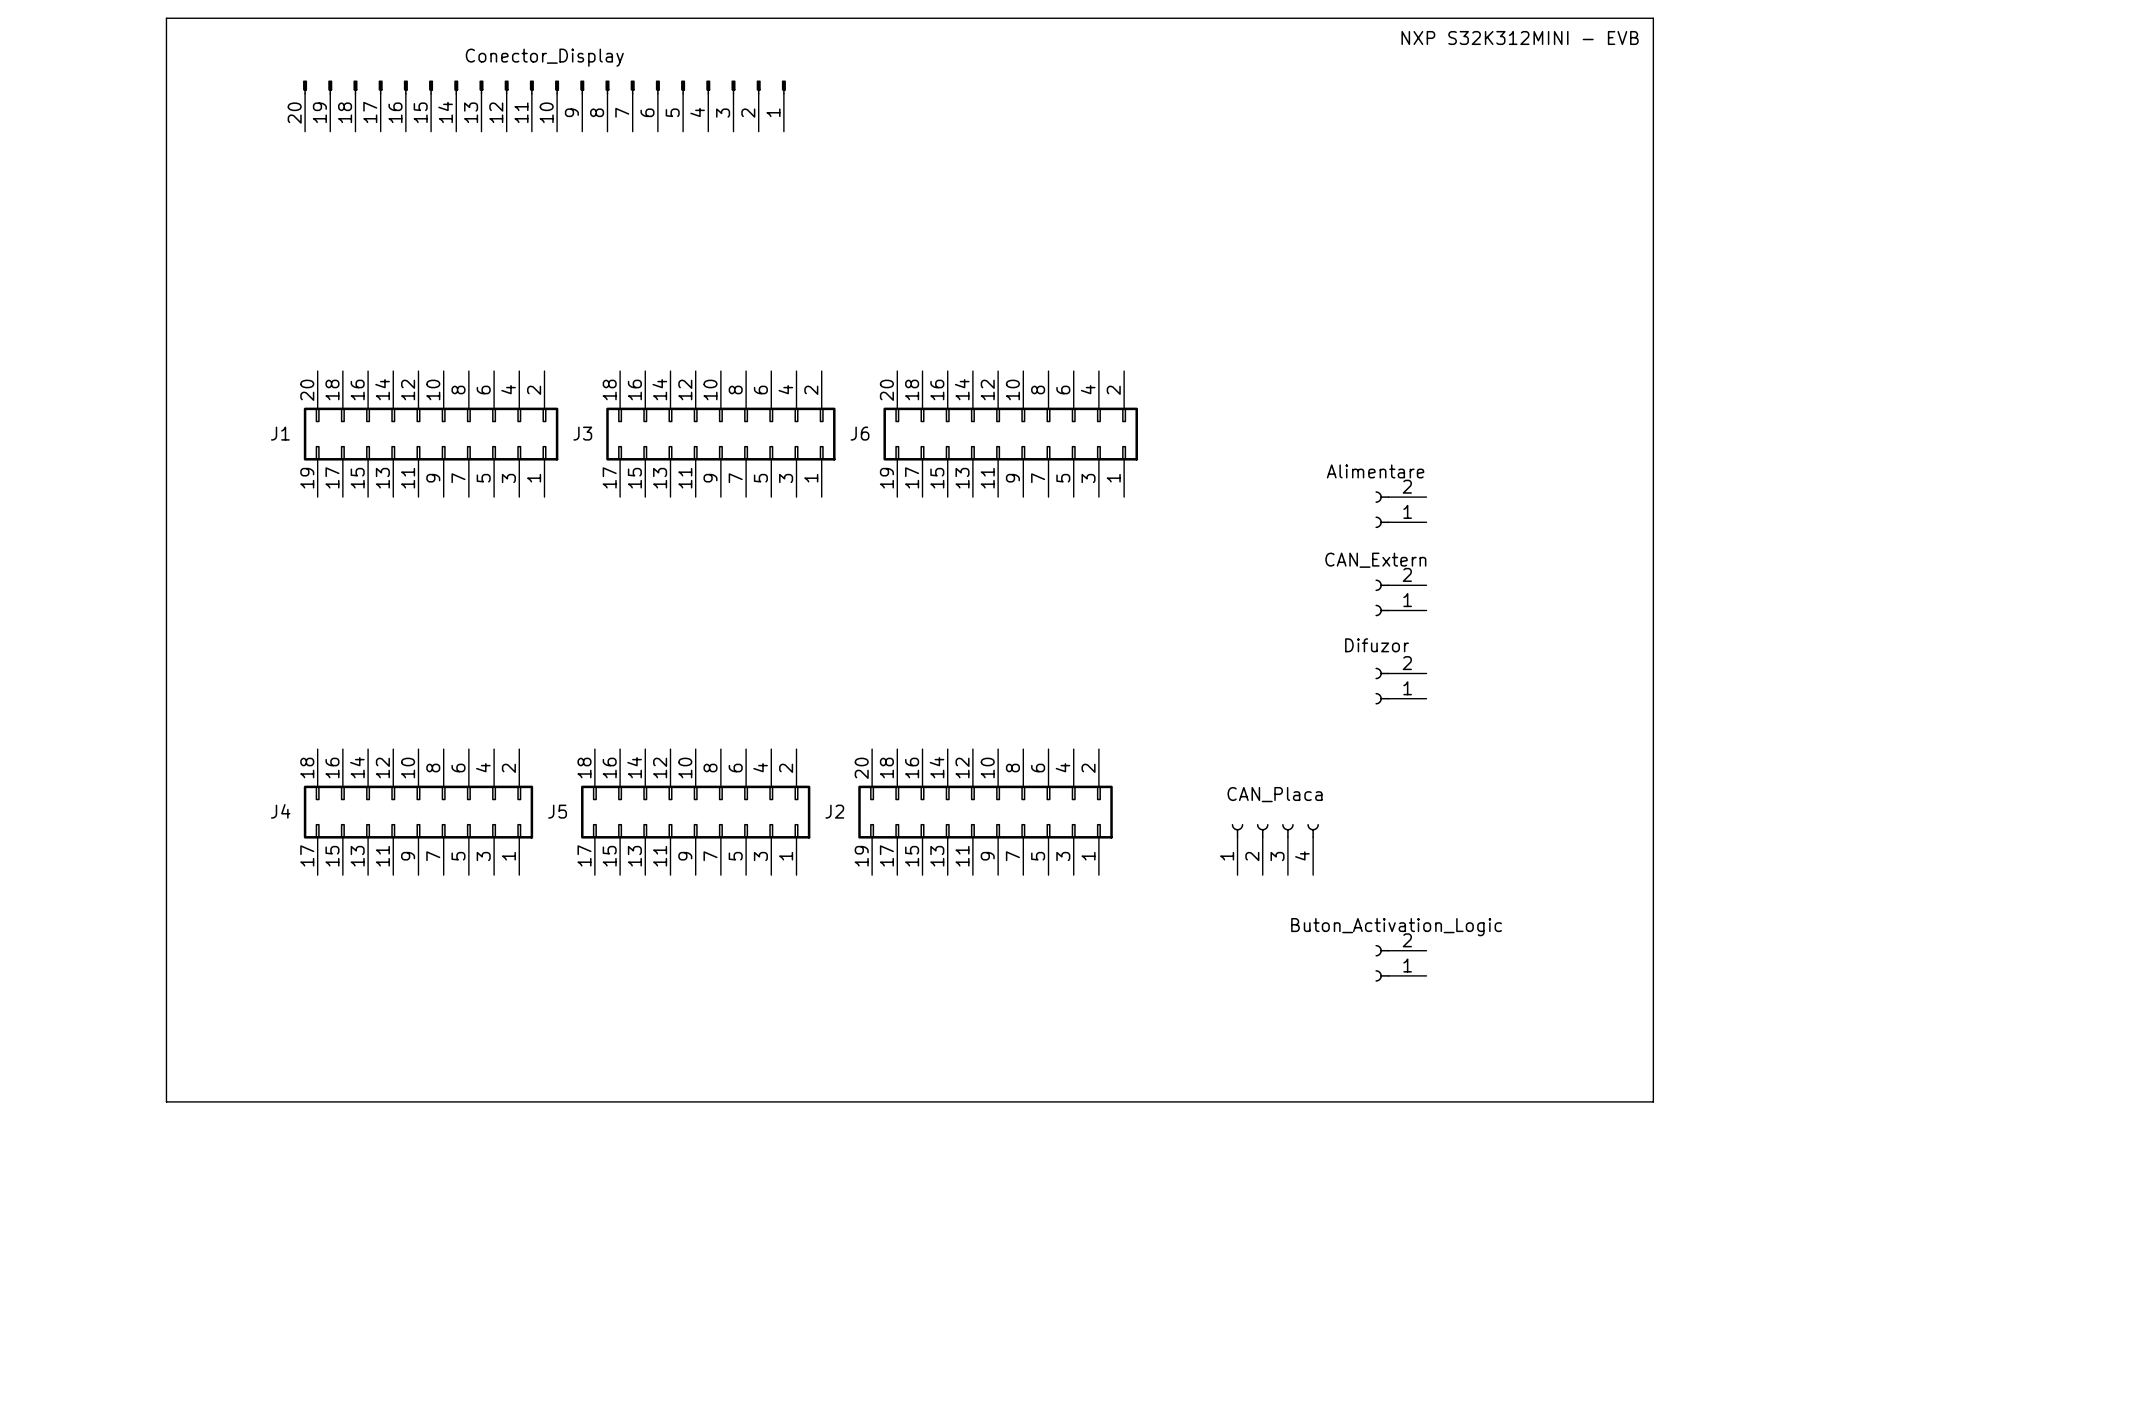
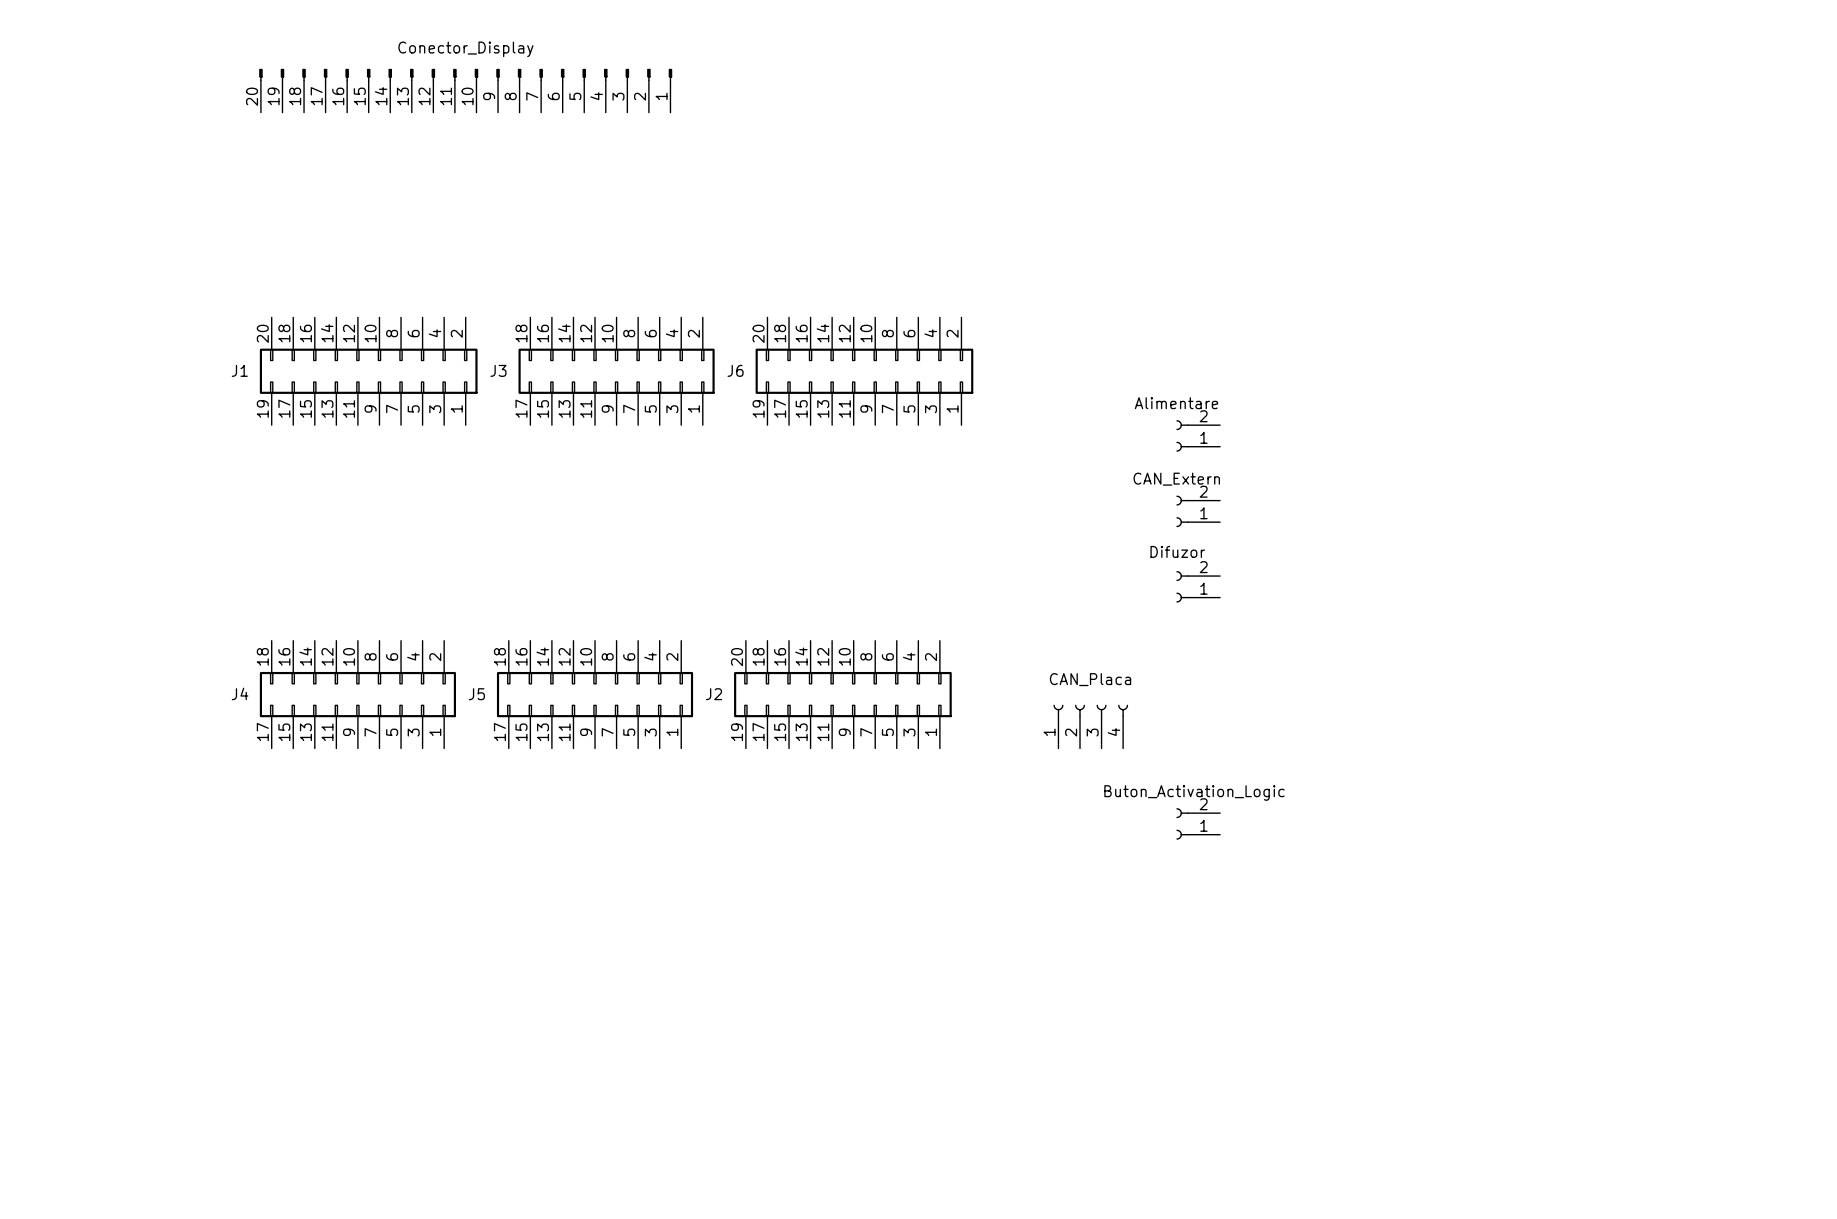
line: (166, 18) (1653, 18) (1653, 1101) (166, 1101) (166, 18) -> none
text: NXP S32K312MINI - EVB (1520, 37) -> none

